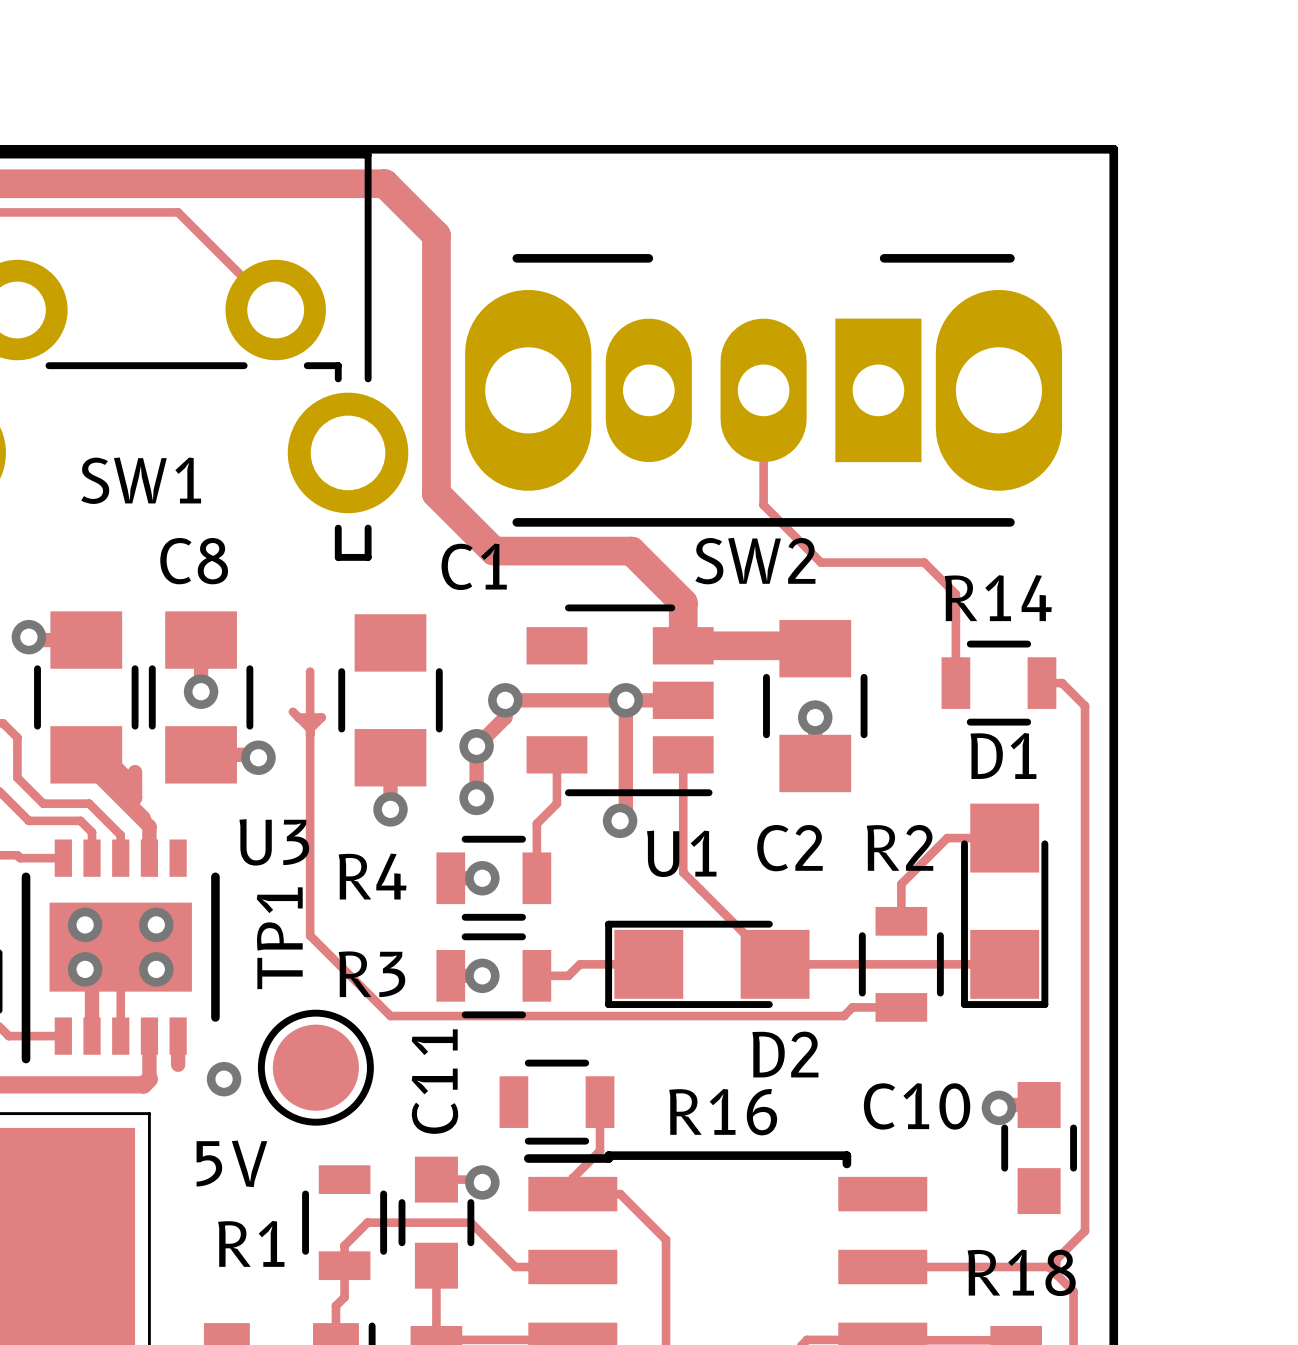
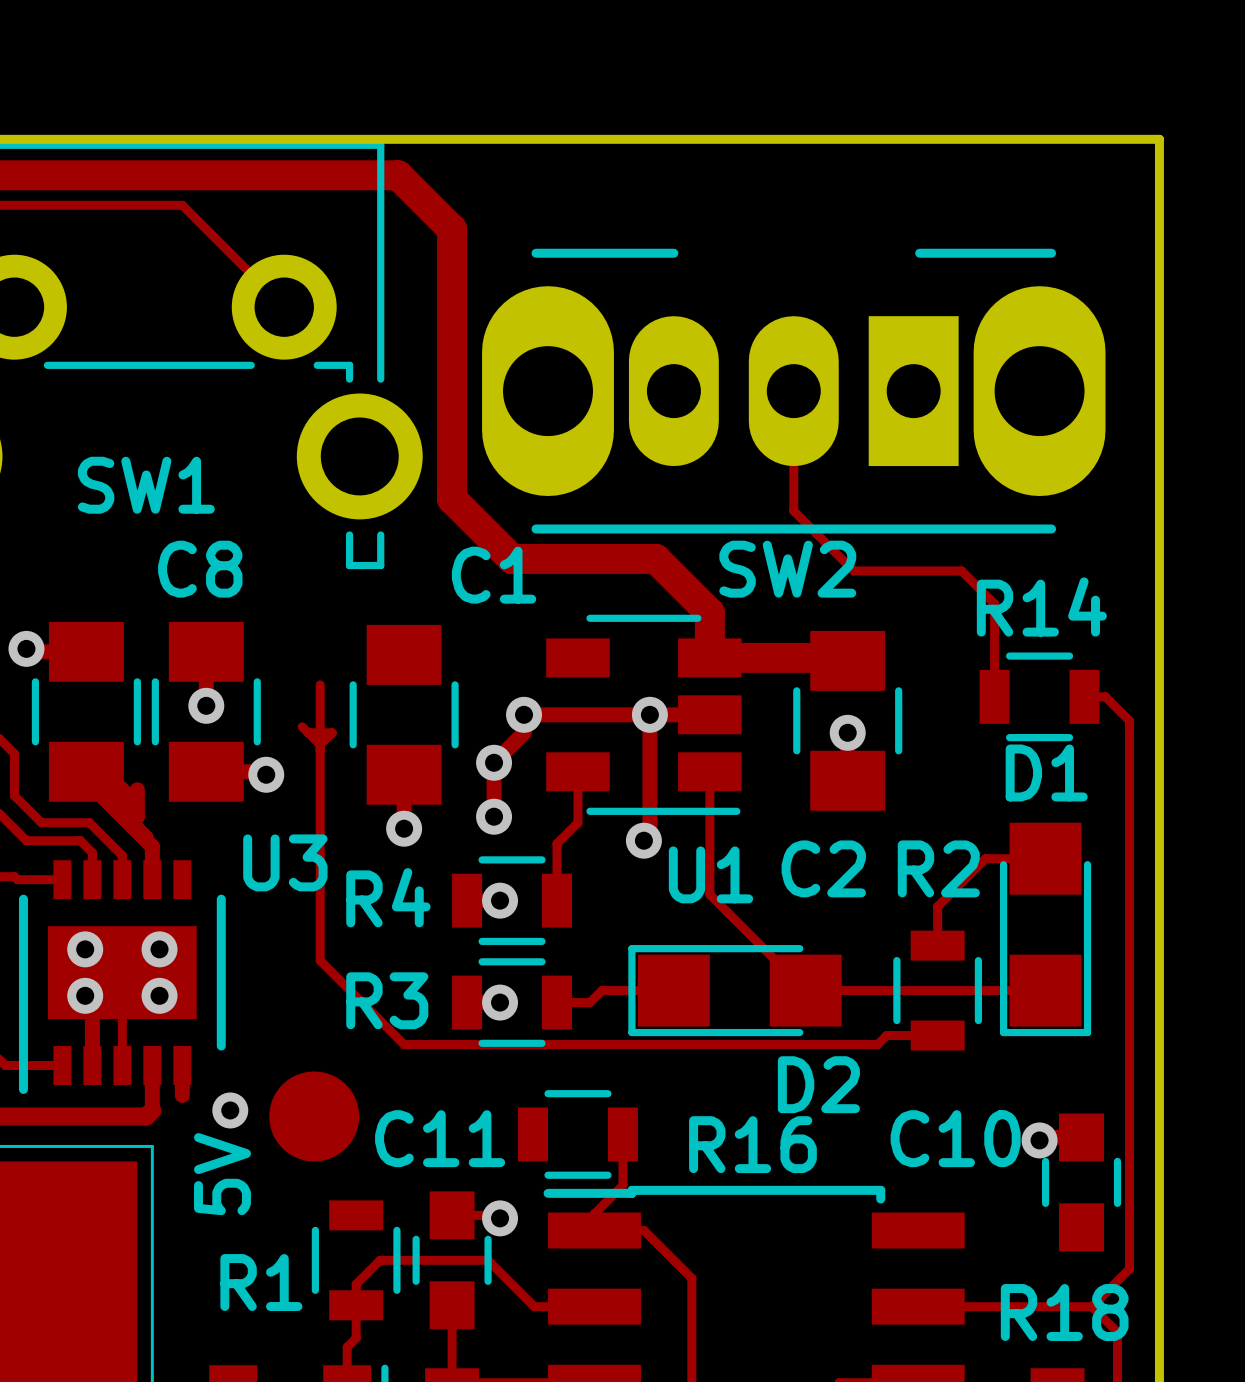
TP1: (315, 1067) -> none
C11 name rotation: 0° (434, 1081) -> 90° clockwise (440, 1138)
part: none -> (314, 1116)
text rotation: 0° (231, 1163) -> 90° counterclockwise (222, 1174)

